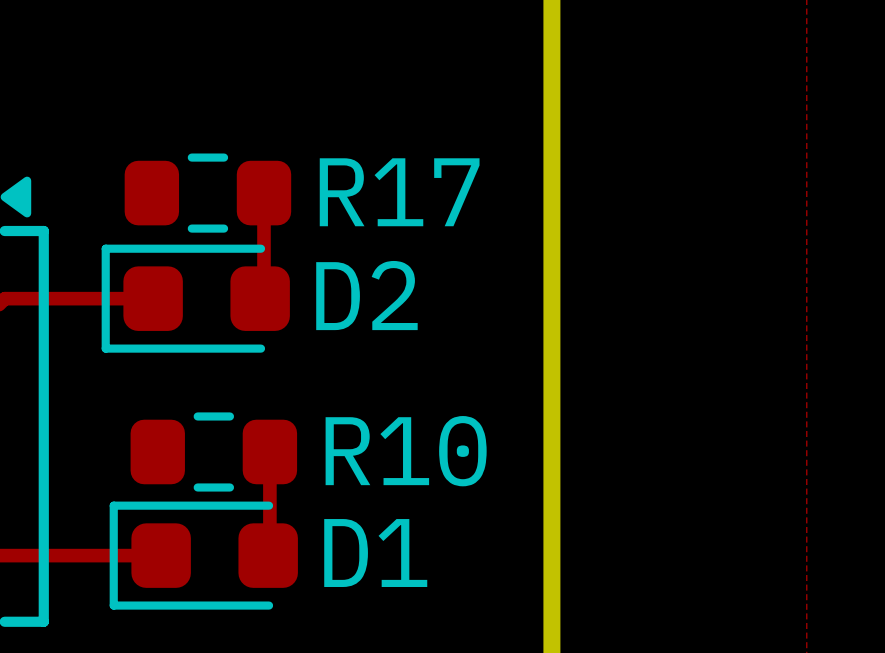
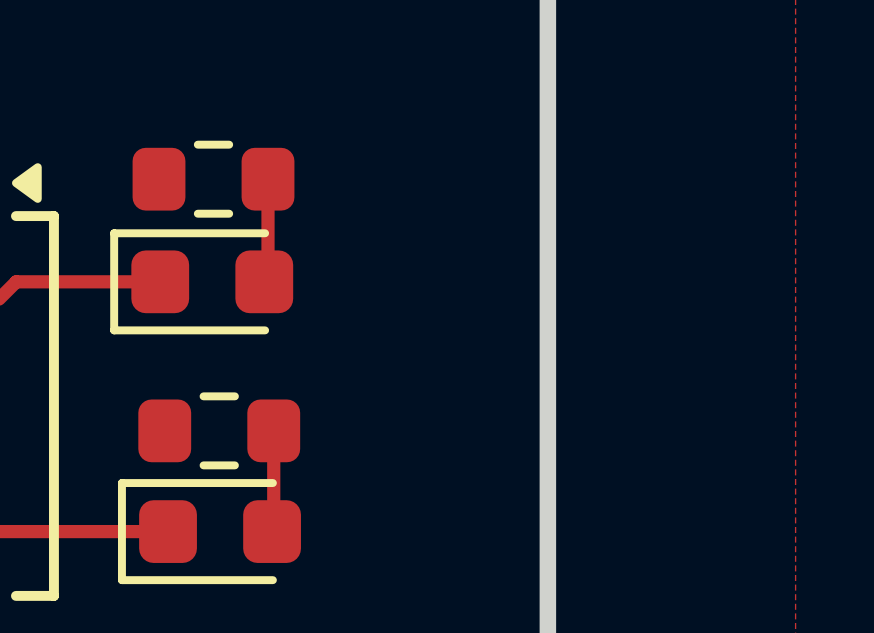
R17 name: R17 (399, 192) -> none
D2 name: D2 (366, 295) -> none
R10 name: R10 (406, 451) -> none
D1 name: D1 (375, 553) -> none

